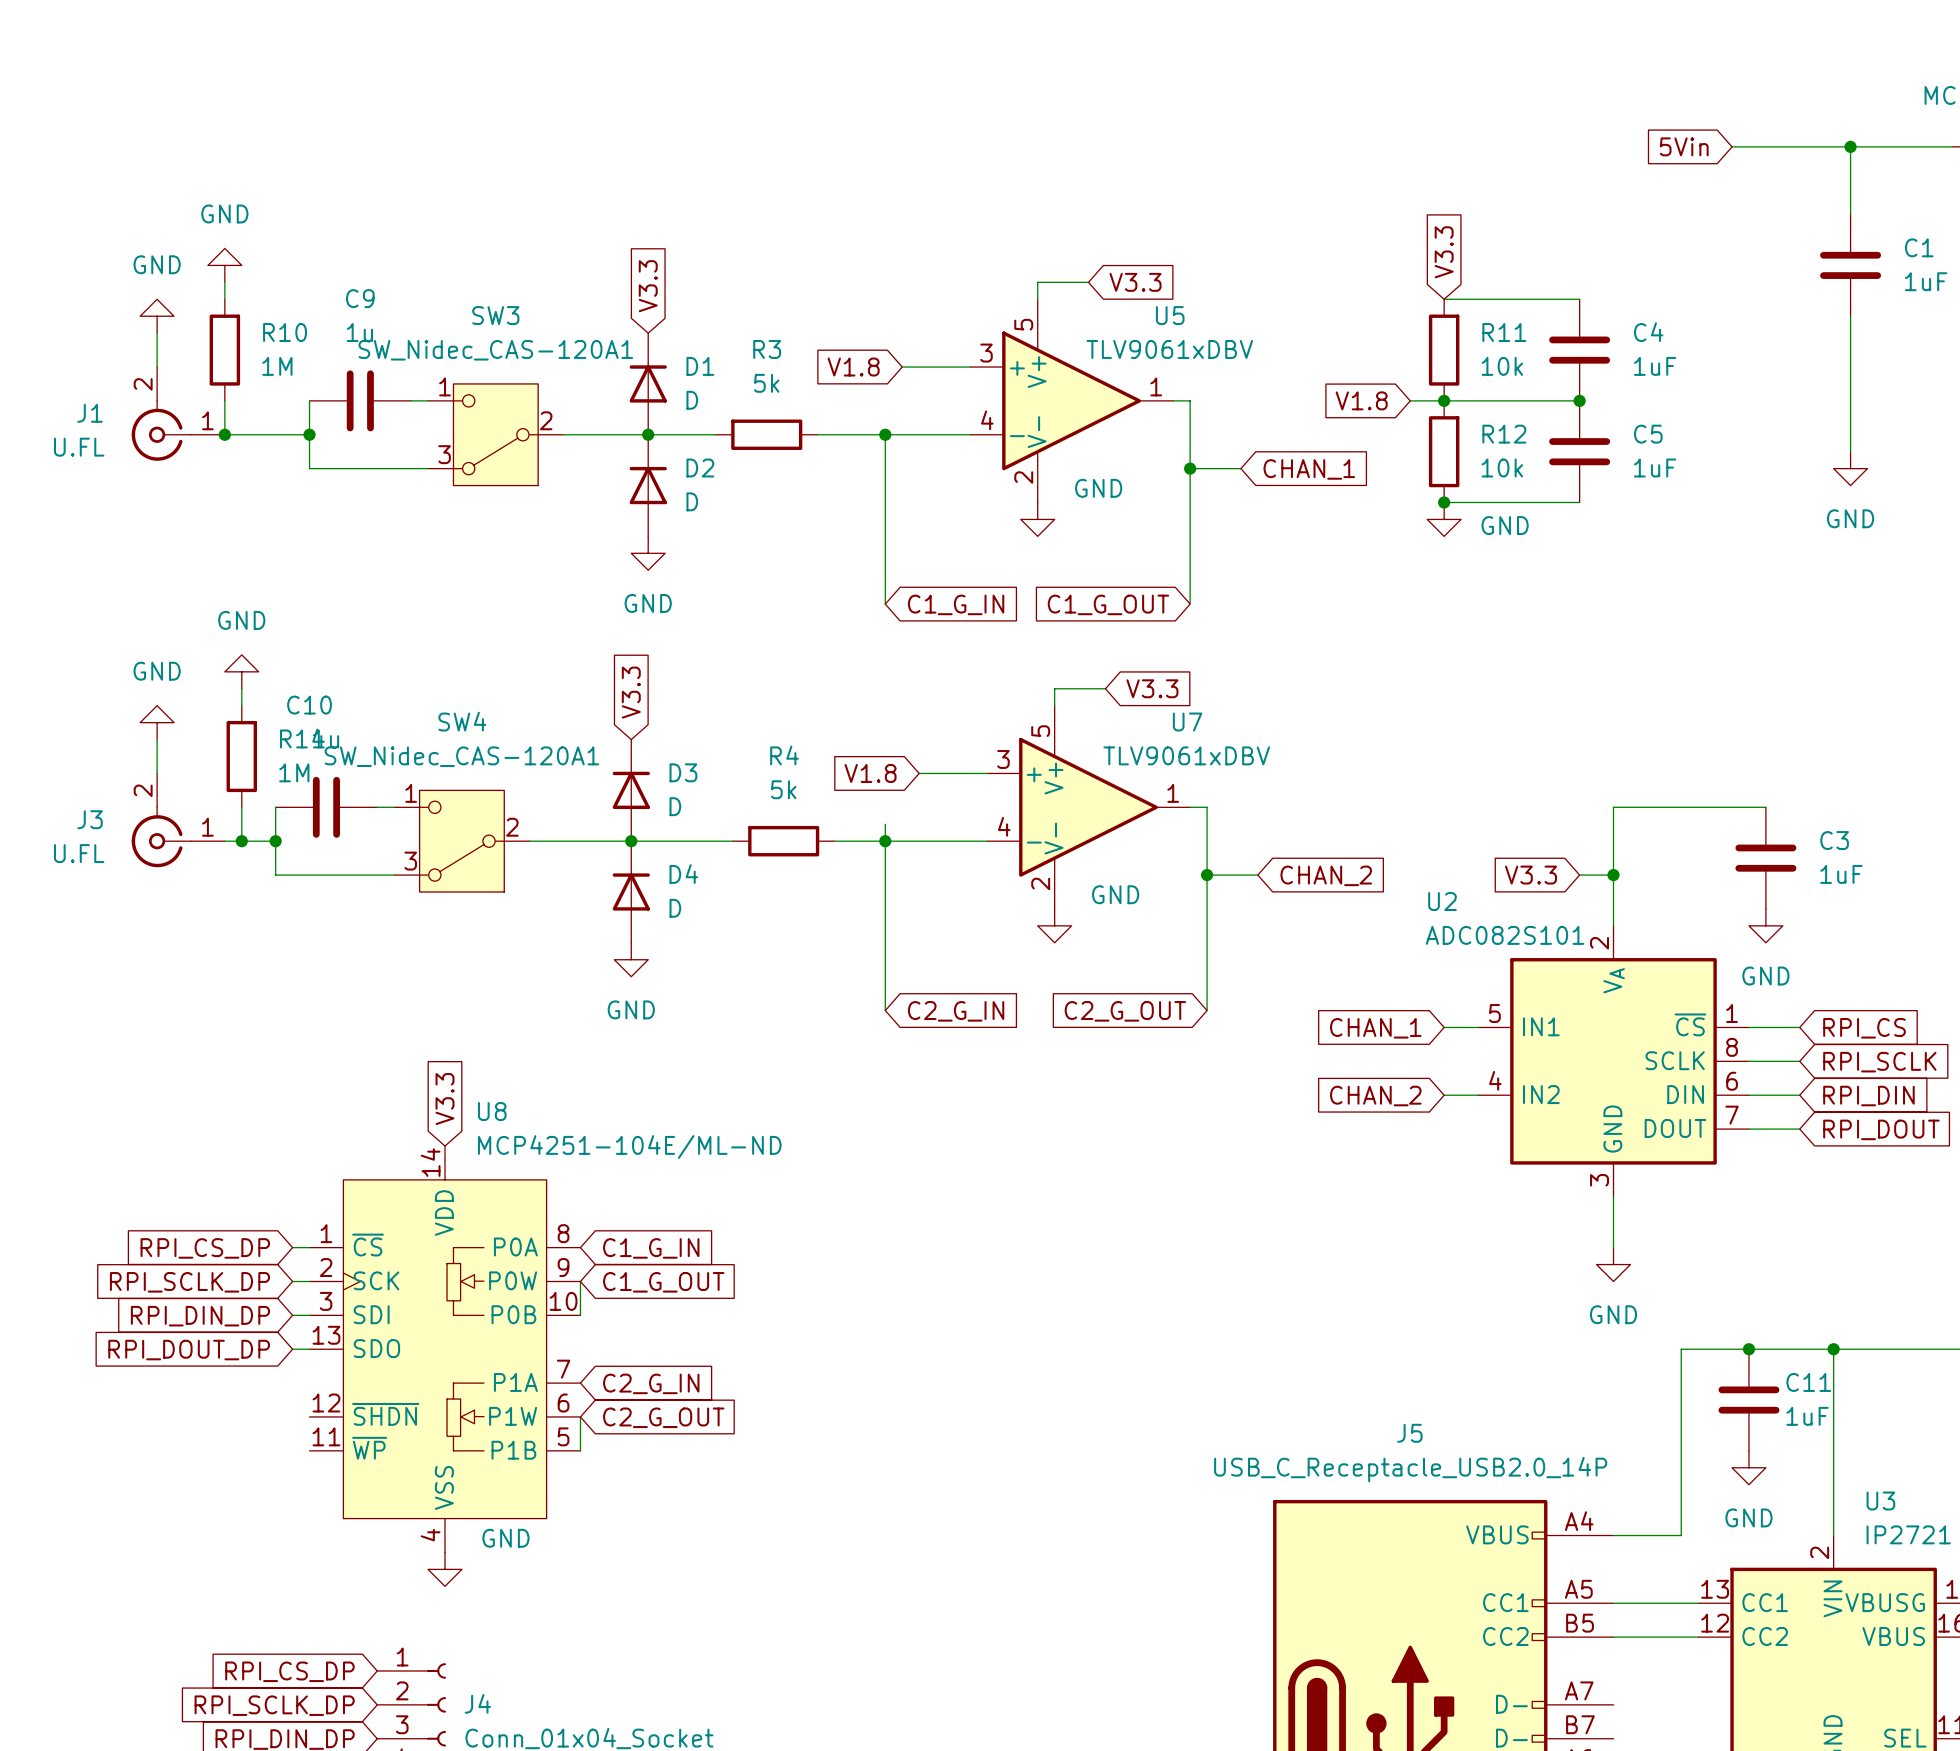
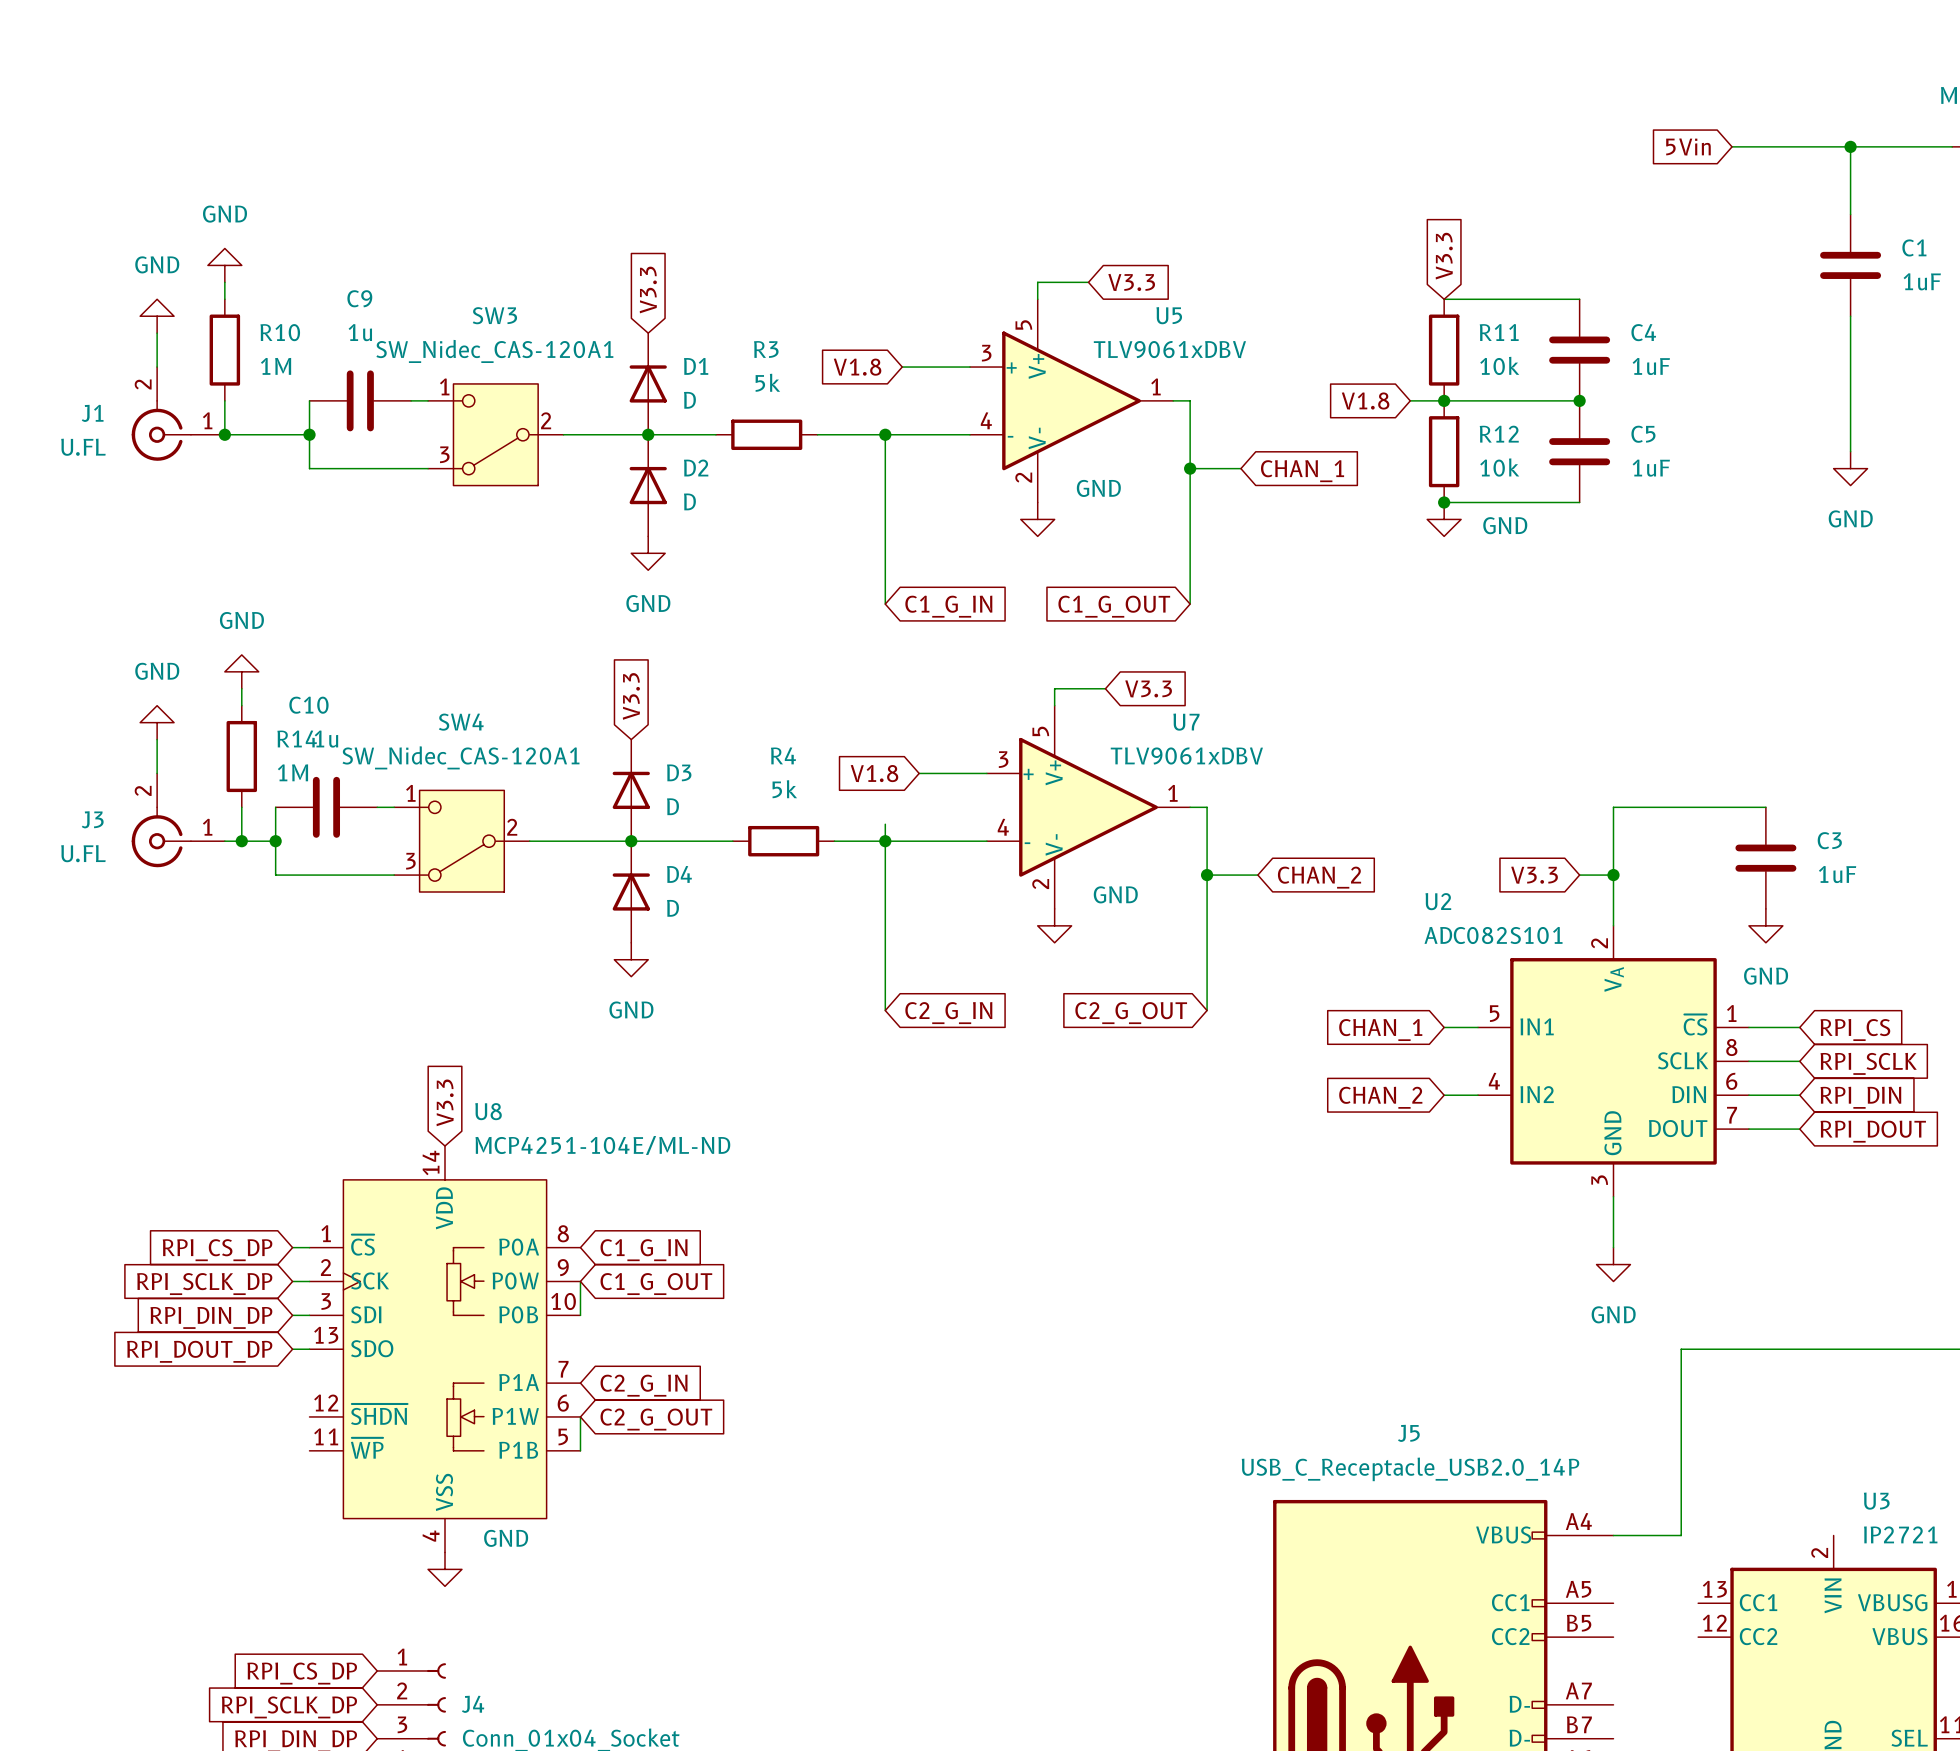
junction: (1748, 1349) -> none
wire: (1833, 1349) (1833, 1535) -> none
junction: (1833, 1349) -> none
C11: 1uF (1748, 1400) -> none
power symbol: GND (1748, 1467) -> none
wire: (1613, 1603) (1698, 1603) -> none
wire: (1613, 1637) (1698, 1637) -> none

